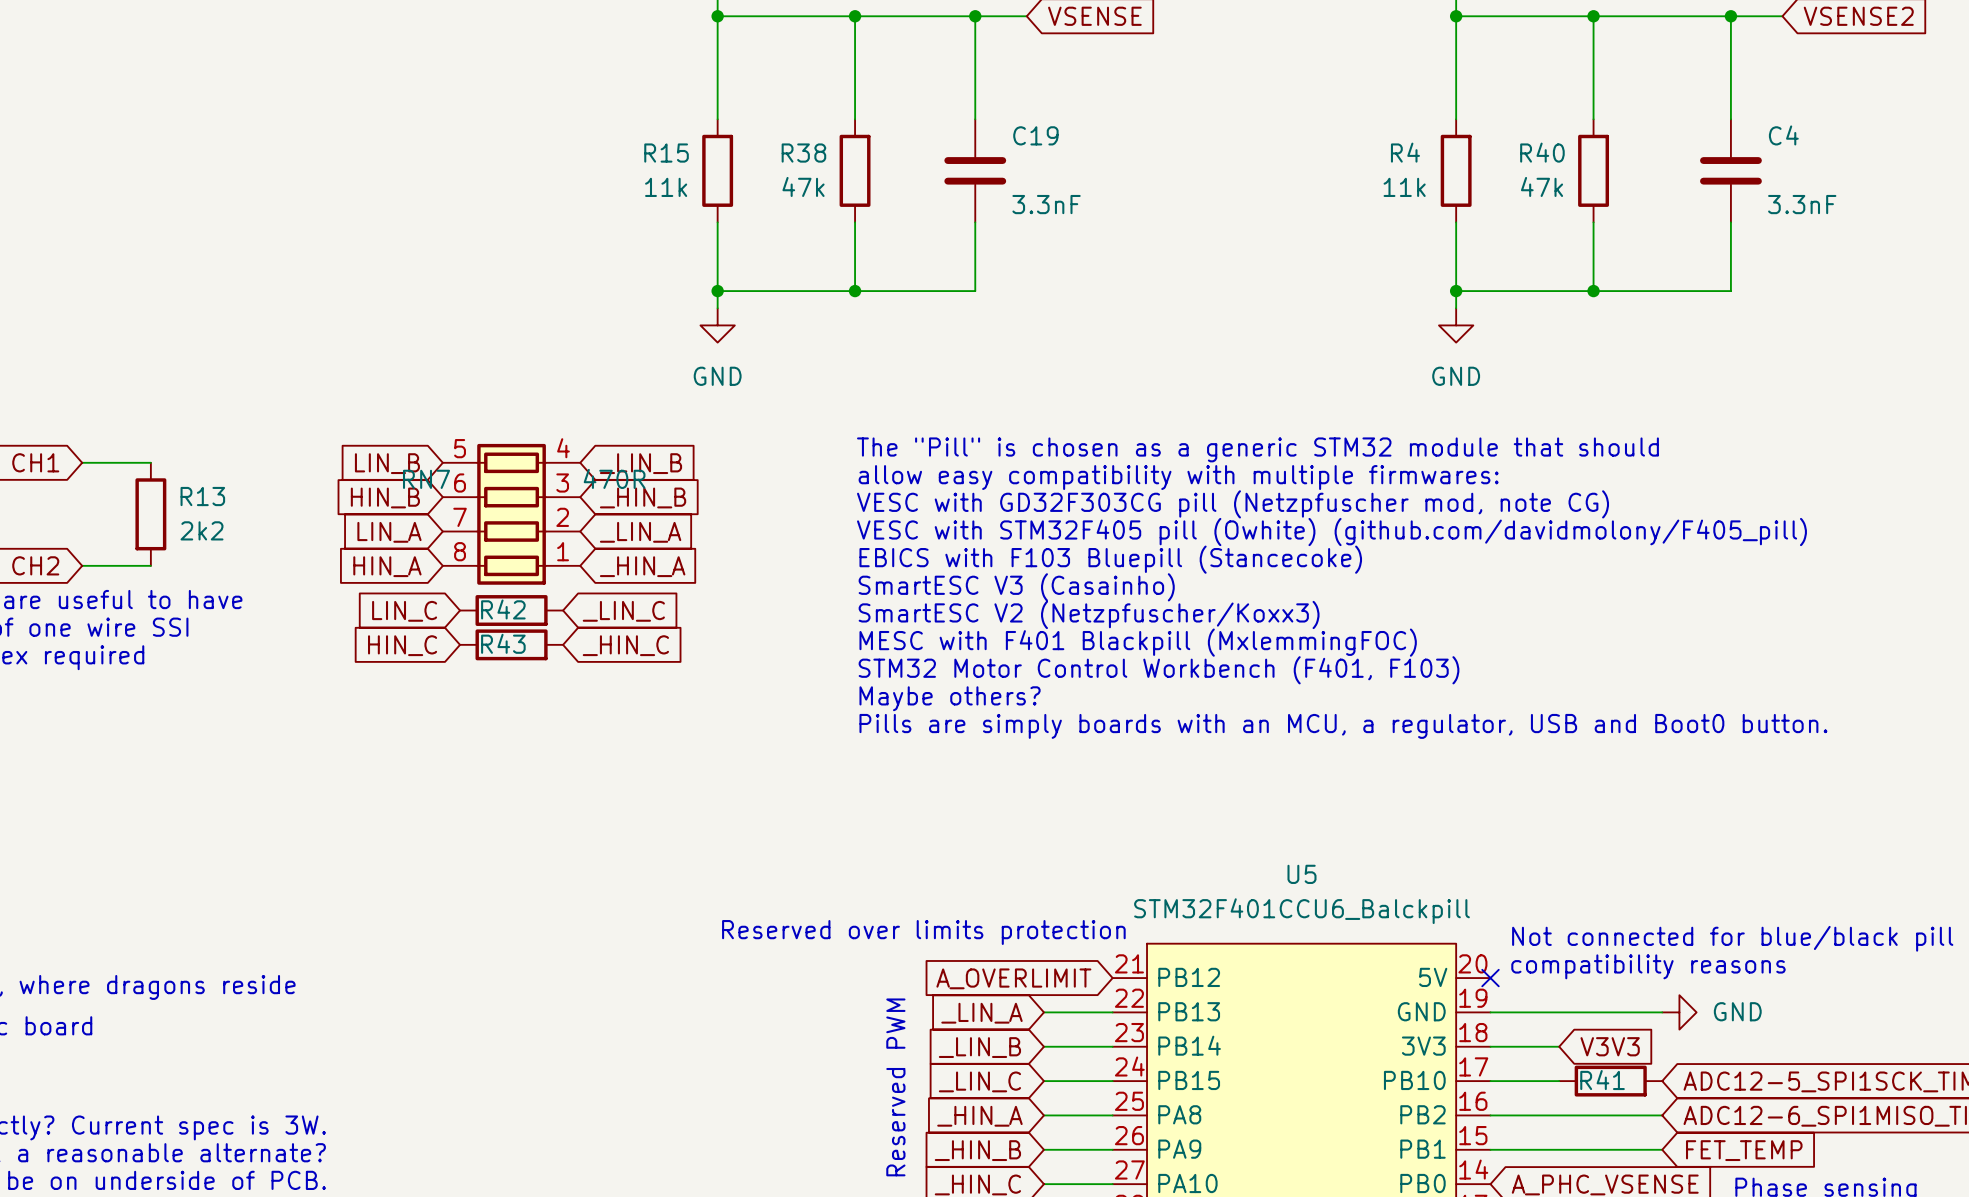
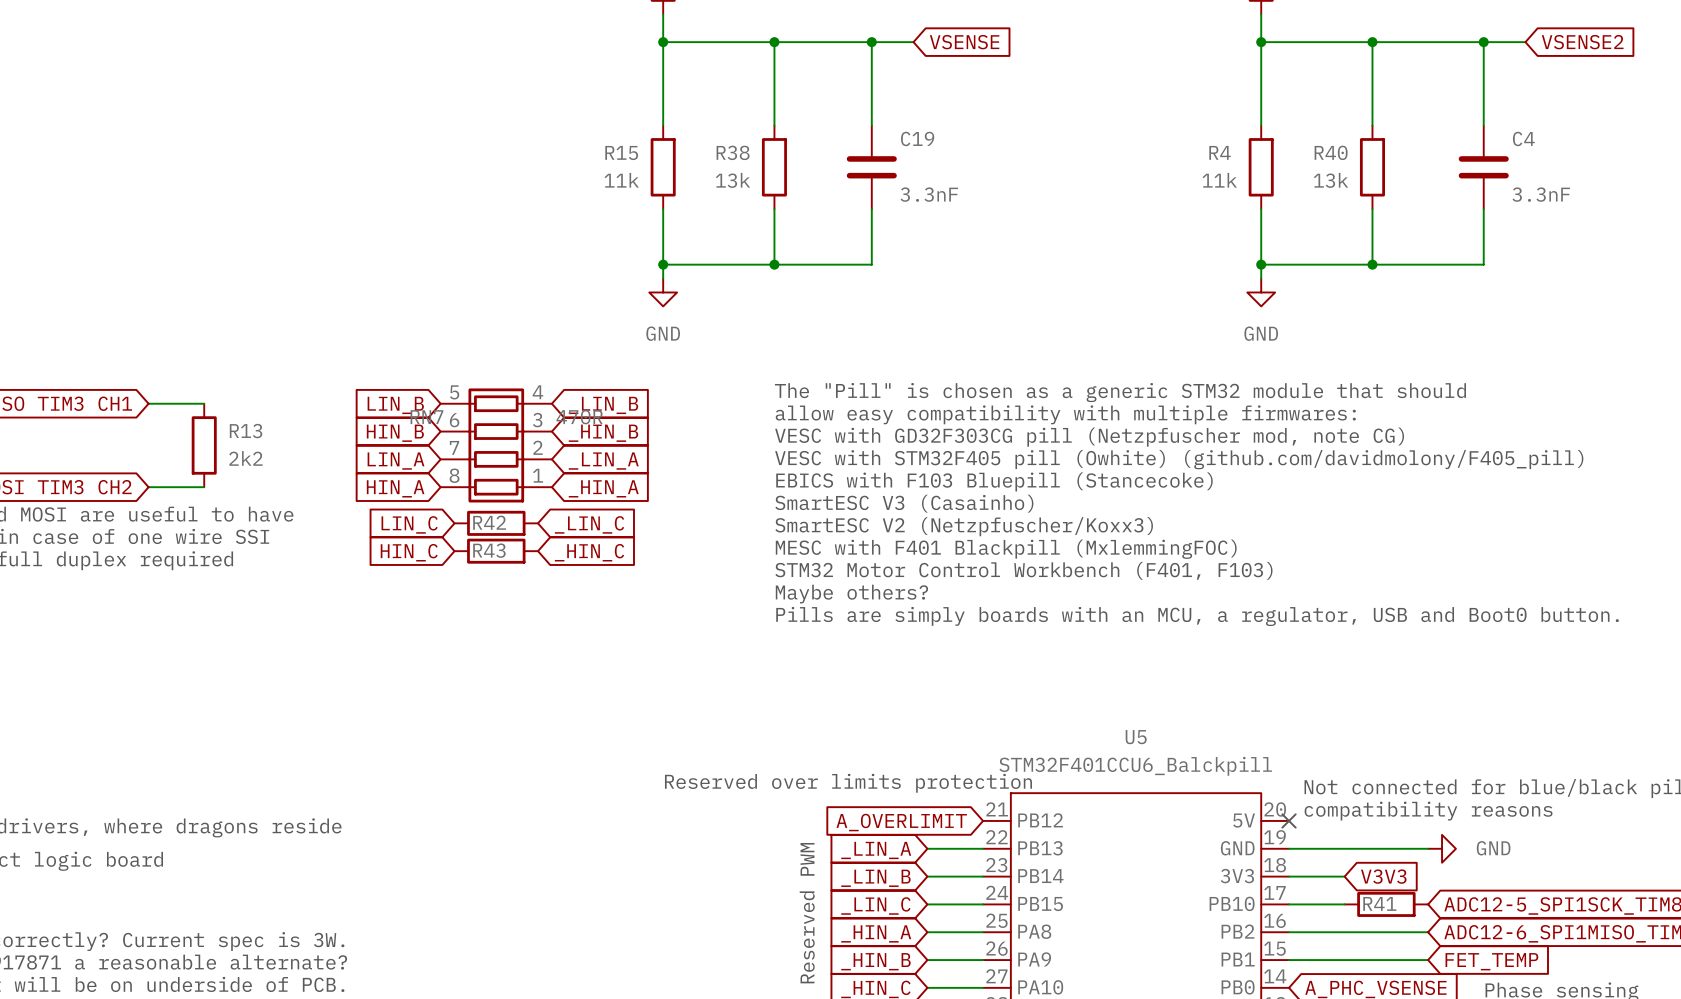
R38 value: 47k (803, 186) -> 13k (732, 180)
R40 value: 47k (1542, 186) -> 13k (1331, 180)

